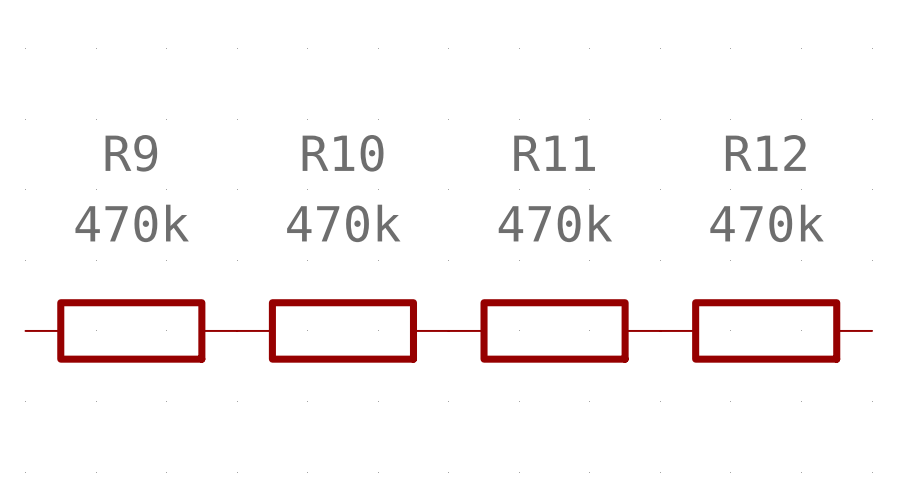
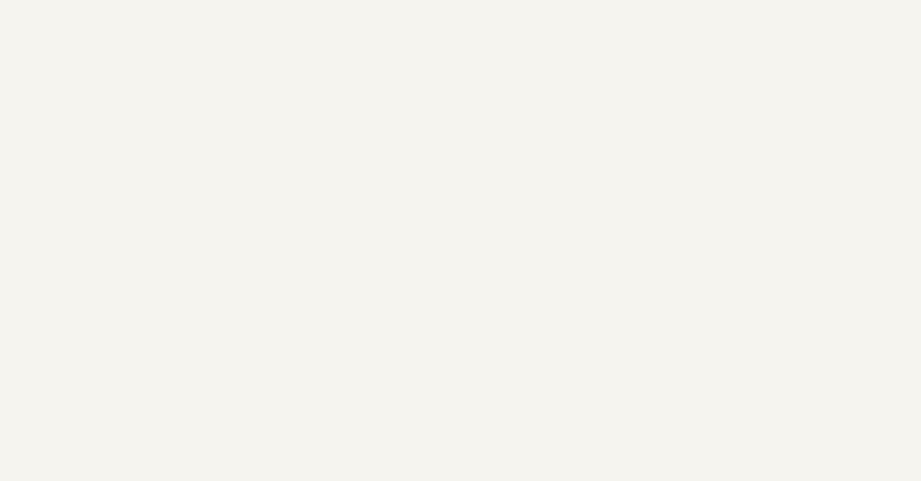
R9: 470k (131, 330) -> none
R10: 470k (342, 330) -> none
R11: 470k (554, 330) -> none
R12: 470k (766, 330) -> none

